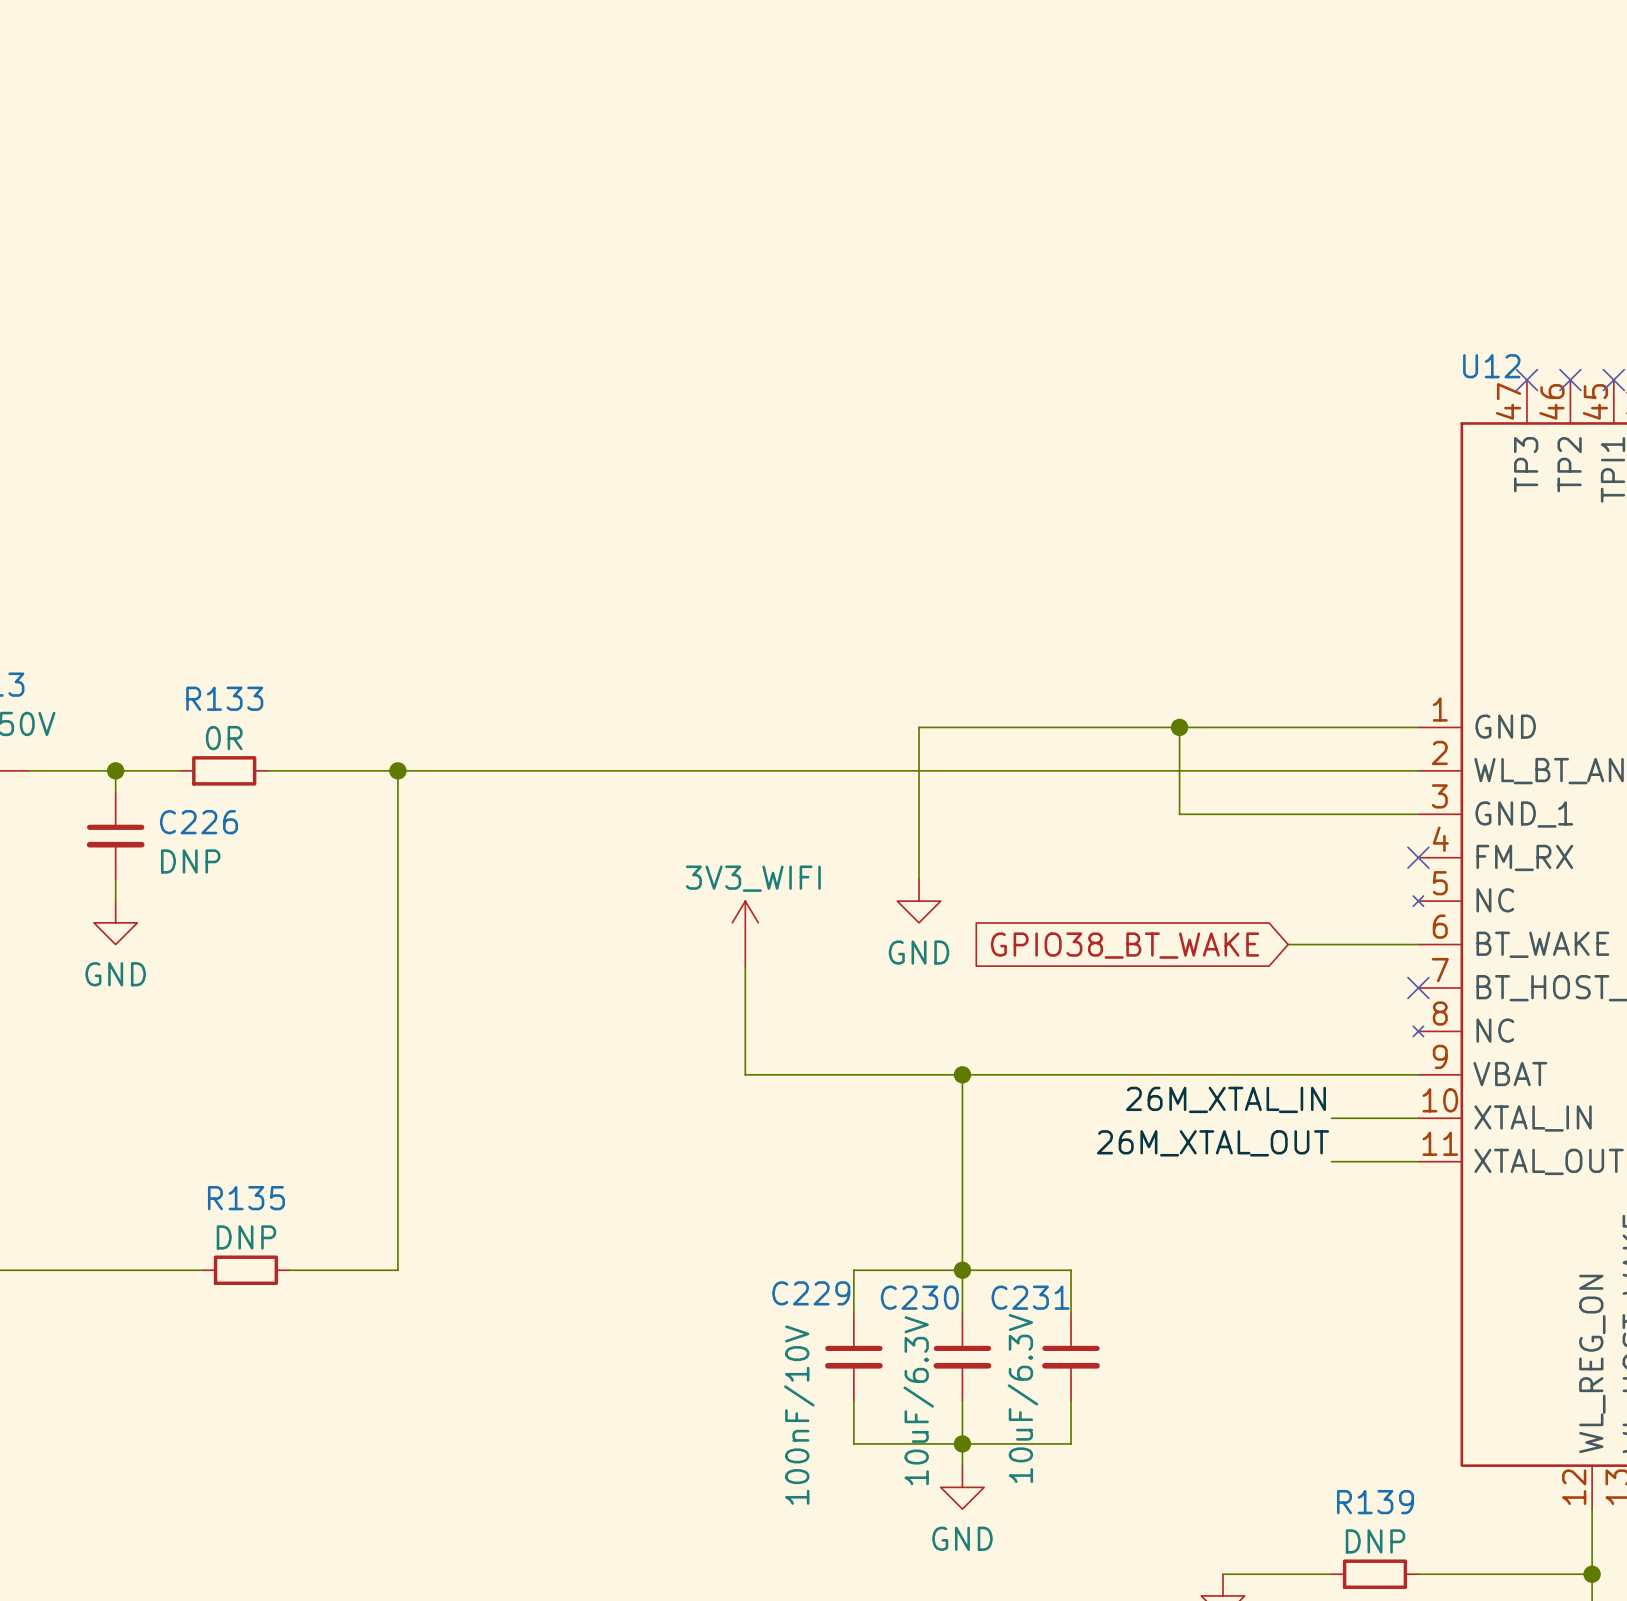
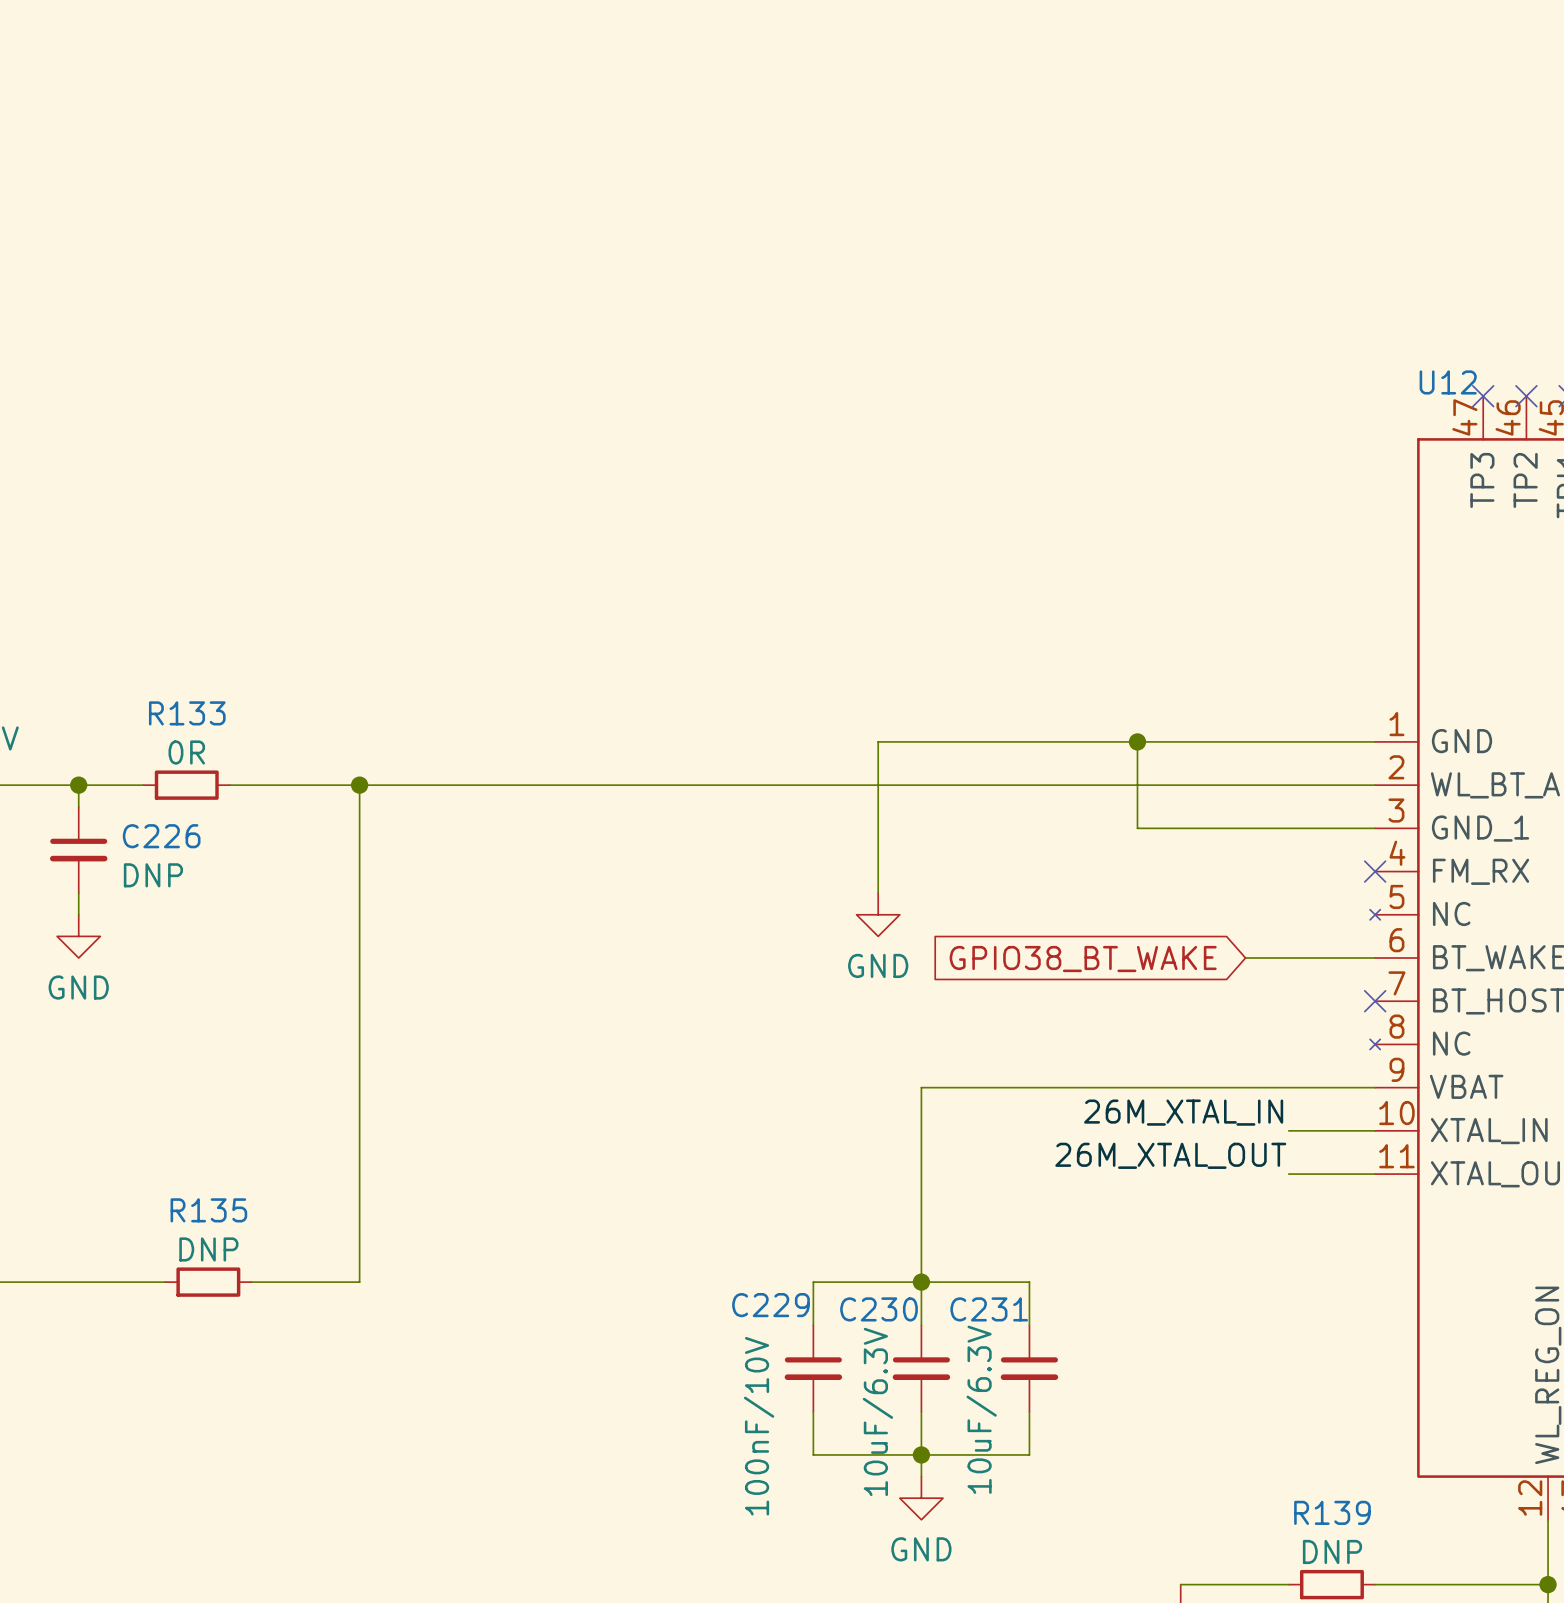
power symbol: 3V3_WIFI (745, 933) -> none
wire: (745, 966) (745, 1074) (962, 1074) -> none
junction: (962, 1074) -> none

